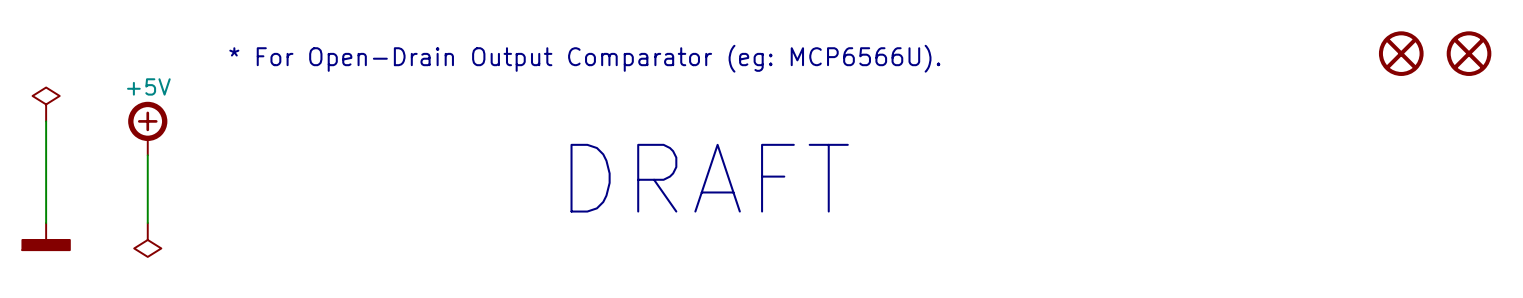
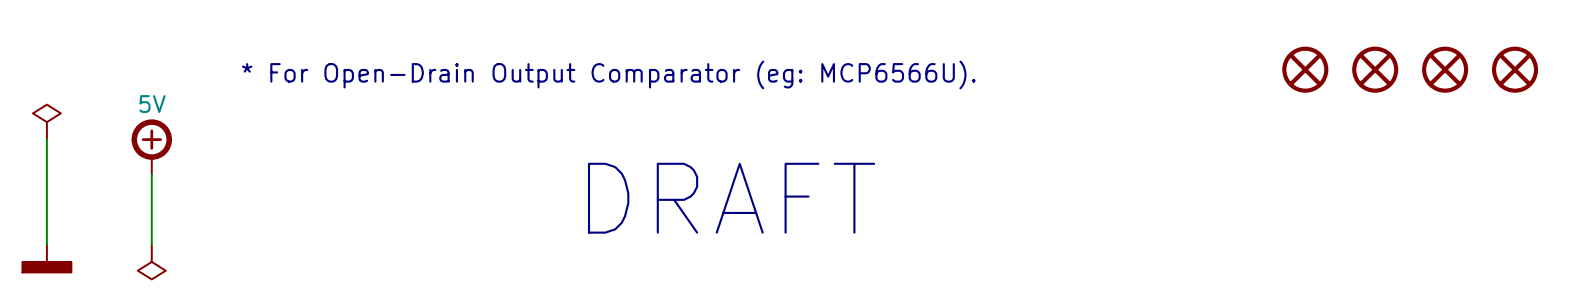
part: none -> (1305, 69)
part: none -> (1375, 69)
text: * For Open-Drain Output Comparator (eg: MCP6566U). (584, 58) -> none
text: none -> * For Open-Drain Output Comparator (eg: MCP6566U). (608, 74)
power symbol text: +5V (148, 86) -> 5V (152, 104)

